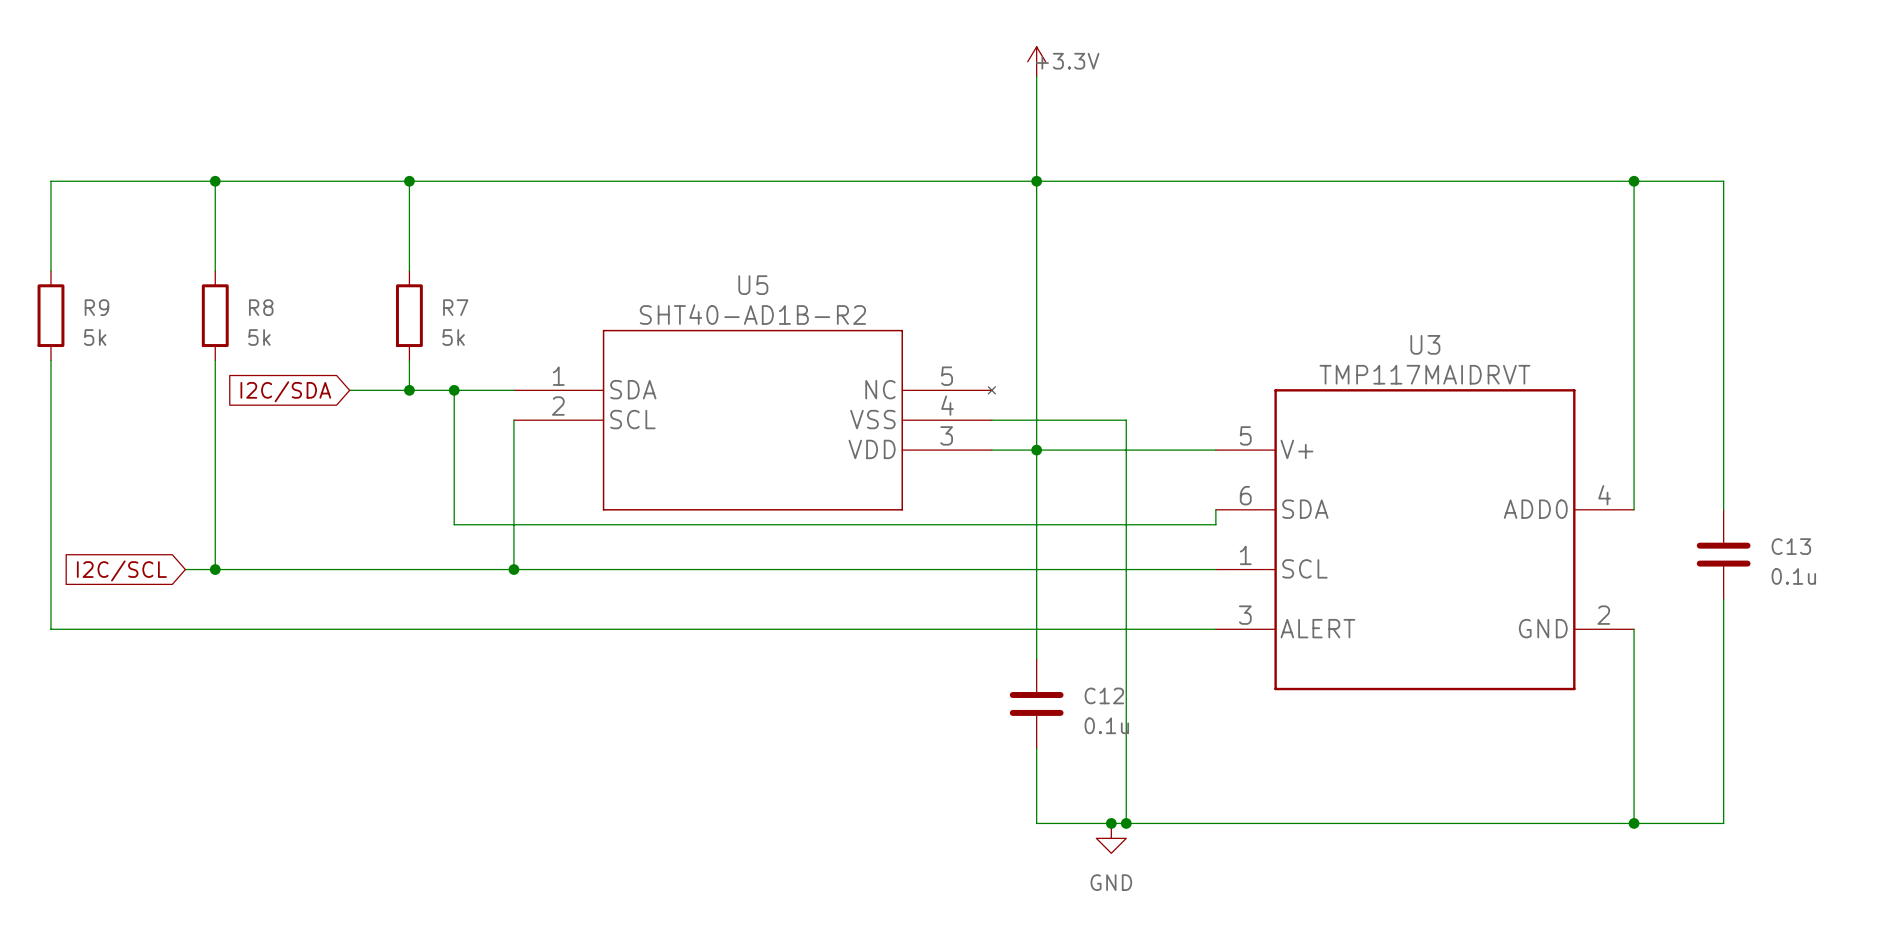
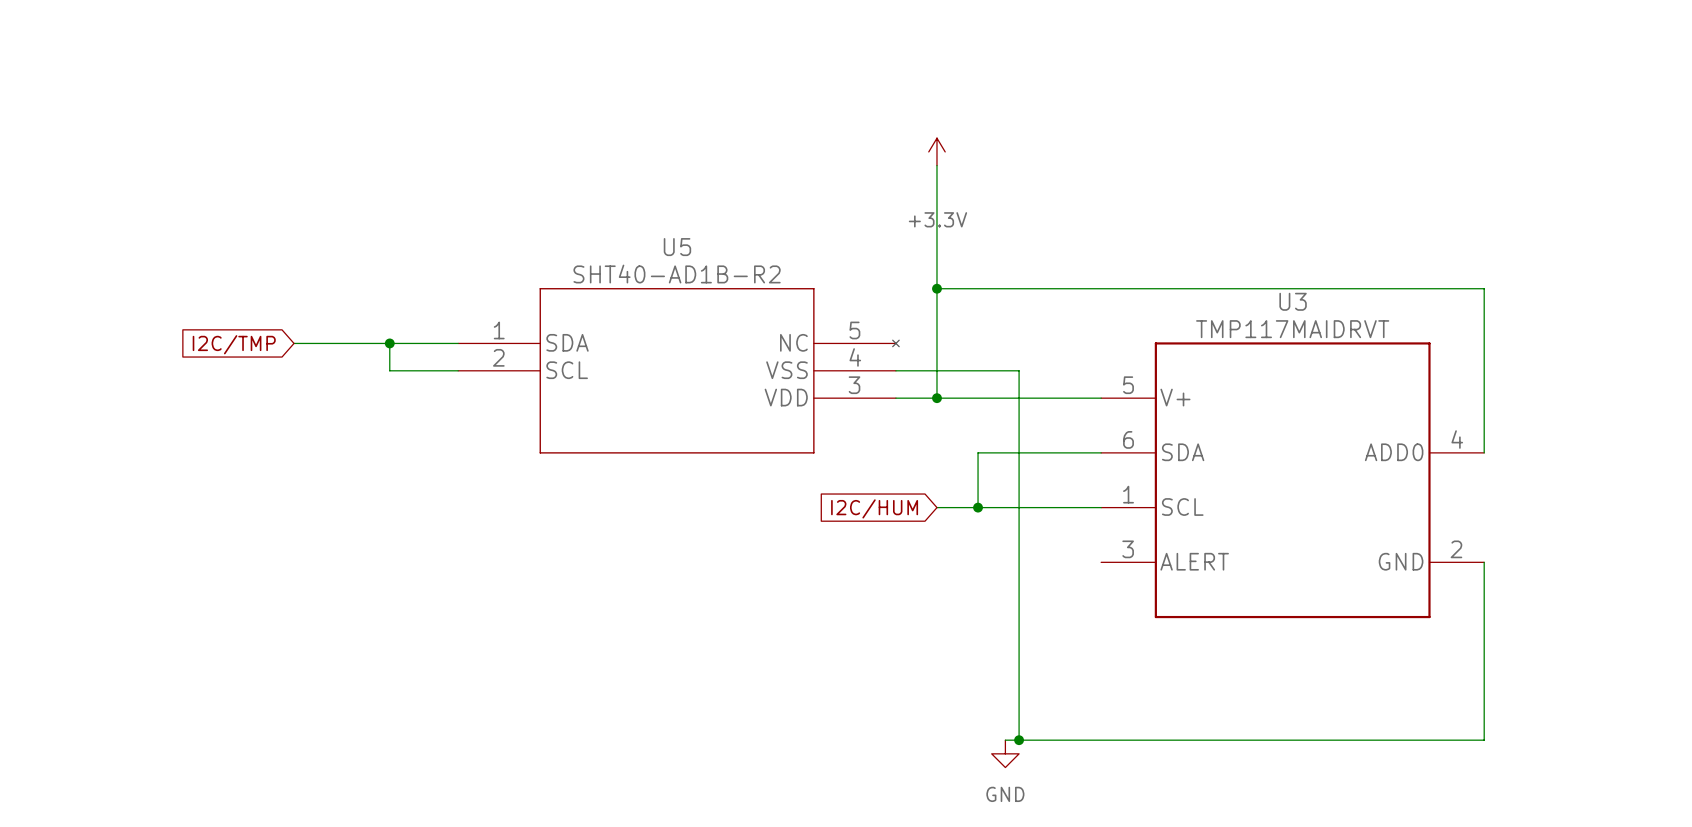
power symbol position: +3.3V (1036, 61) -> +3.3V (936, 151)
power symbol text position: +3.3V (1067, 61) -> +3.3V (937, 219)
wire: (1036, 76) (1036, 196) -> none
wire: (215, 181) (215, 270) -> none
junction: (215, 181) -> none
wire: (409, 181) (409, 270) -> none
junction: (409, 181) -> none
junction: (1036, 181) -> none
wire: (1634, 181) (1634, 330) -> (936, 288) (1484, 288)
junction: (1634, 181) -> none
wire: (50, 270) (50, 181) (1723, 181) (1723, 509) -> none
R9: 5k (50, 315) -> none
R8: 5k (215, 315) -> none
R7: 5k (409, 315) -> none
junction: none -> (936, 288)
wire: (50, 360) (50, 629) (1215, 629) -> none
wire: (215, 360) (215, 569) -> none
wire: (409, 360) (409, 390) -> none
wire: none -> (294, 343) (307, 343)
junction: (409, 390) -> none
junction: none -> (389, 343)
wire: (454, 390) (454, 524) (1215, 524) (1215, 509) -> (978, 507) (978, 452) (1101, 452)
junction: (454, 390) -> none
global label: none -> I2C/TMP (234, 344)
global label: I2C/SDA (285, 391) -> none
wire: (513, 420) (513, 569) -> (458, 370) (389, 370) (389, 343)
wire: (1036, 450) (1036, 659) -> none
C13: 0.1u (1723, 554) -> none
wire: (185, 569) (1036, 569) -> none
junction: (215, 569) -> none
junction: (513, 569) -> none
junction: none -> (978, 507)
global label: I2C/SCL (121, 570) -> none
global label: none -> I2C/HUM (874, 508)
wire: (1723, 599) (1723, 823) (1634, 823) -> none
C12: 0.1u (1036, 703) -> none
wire: (1036, 748) (1036, 823) (1111, 823) -> none
junction: (1111, 823) -> none
junction: (1634, 823) -> none

